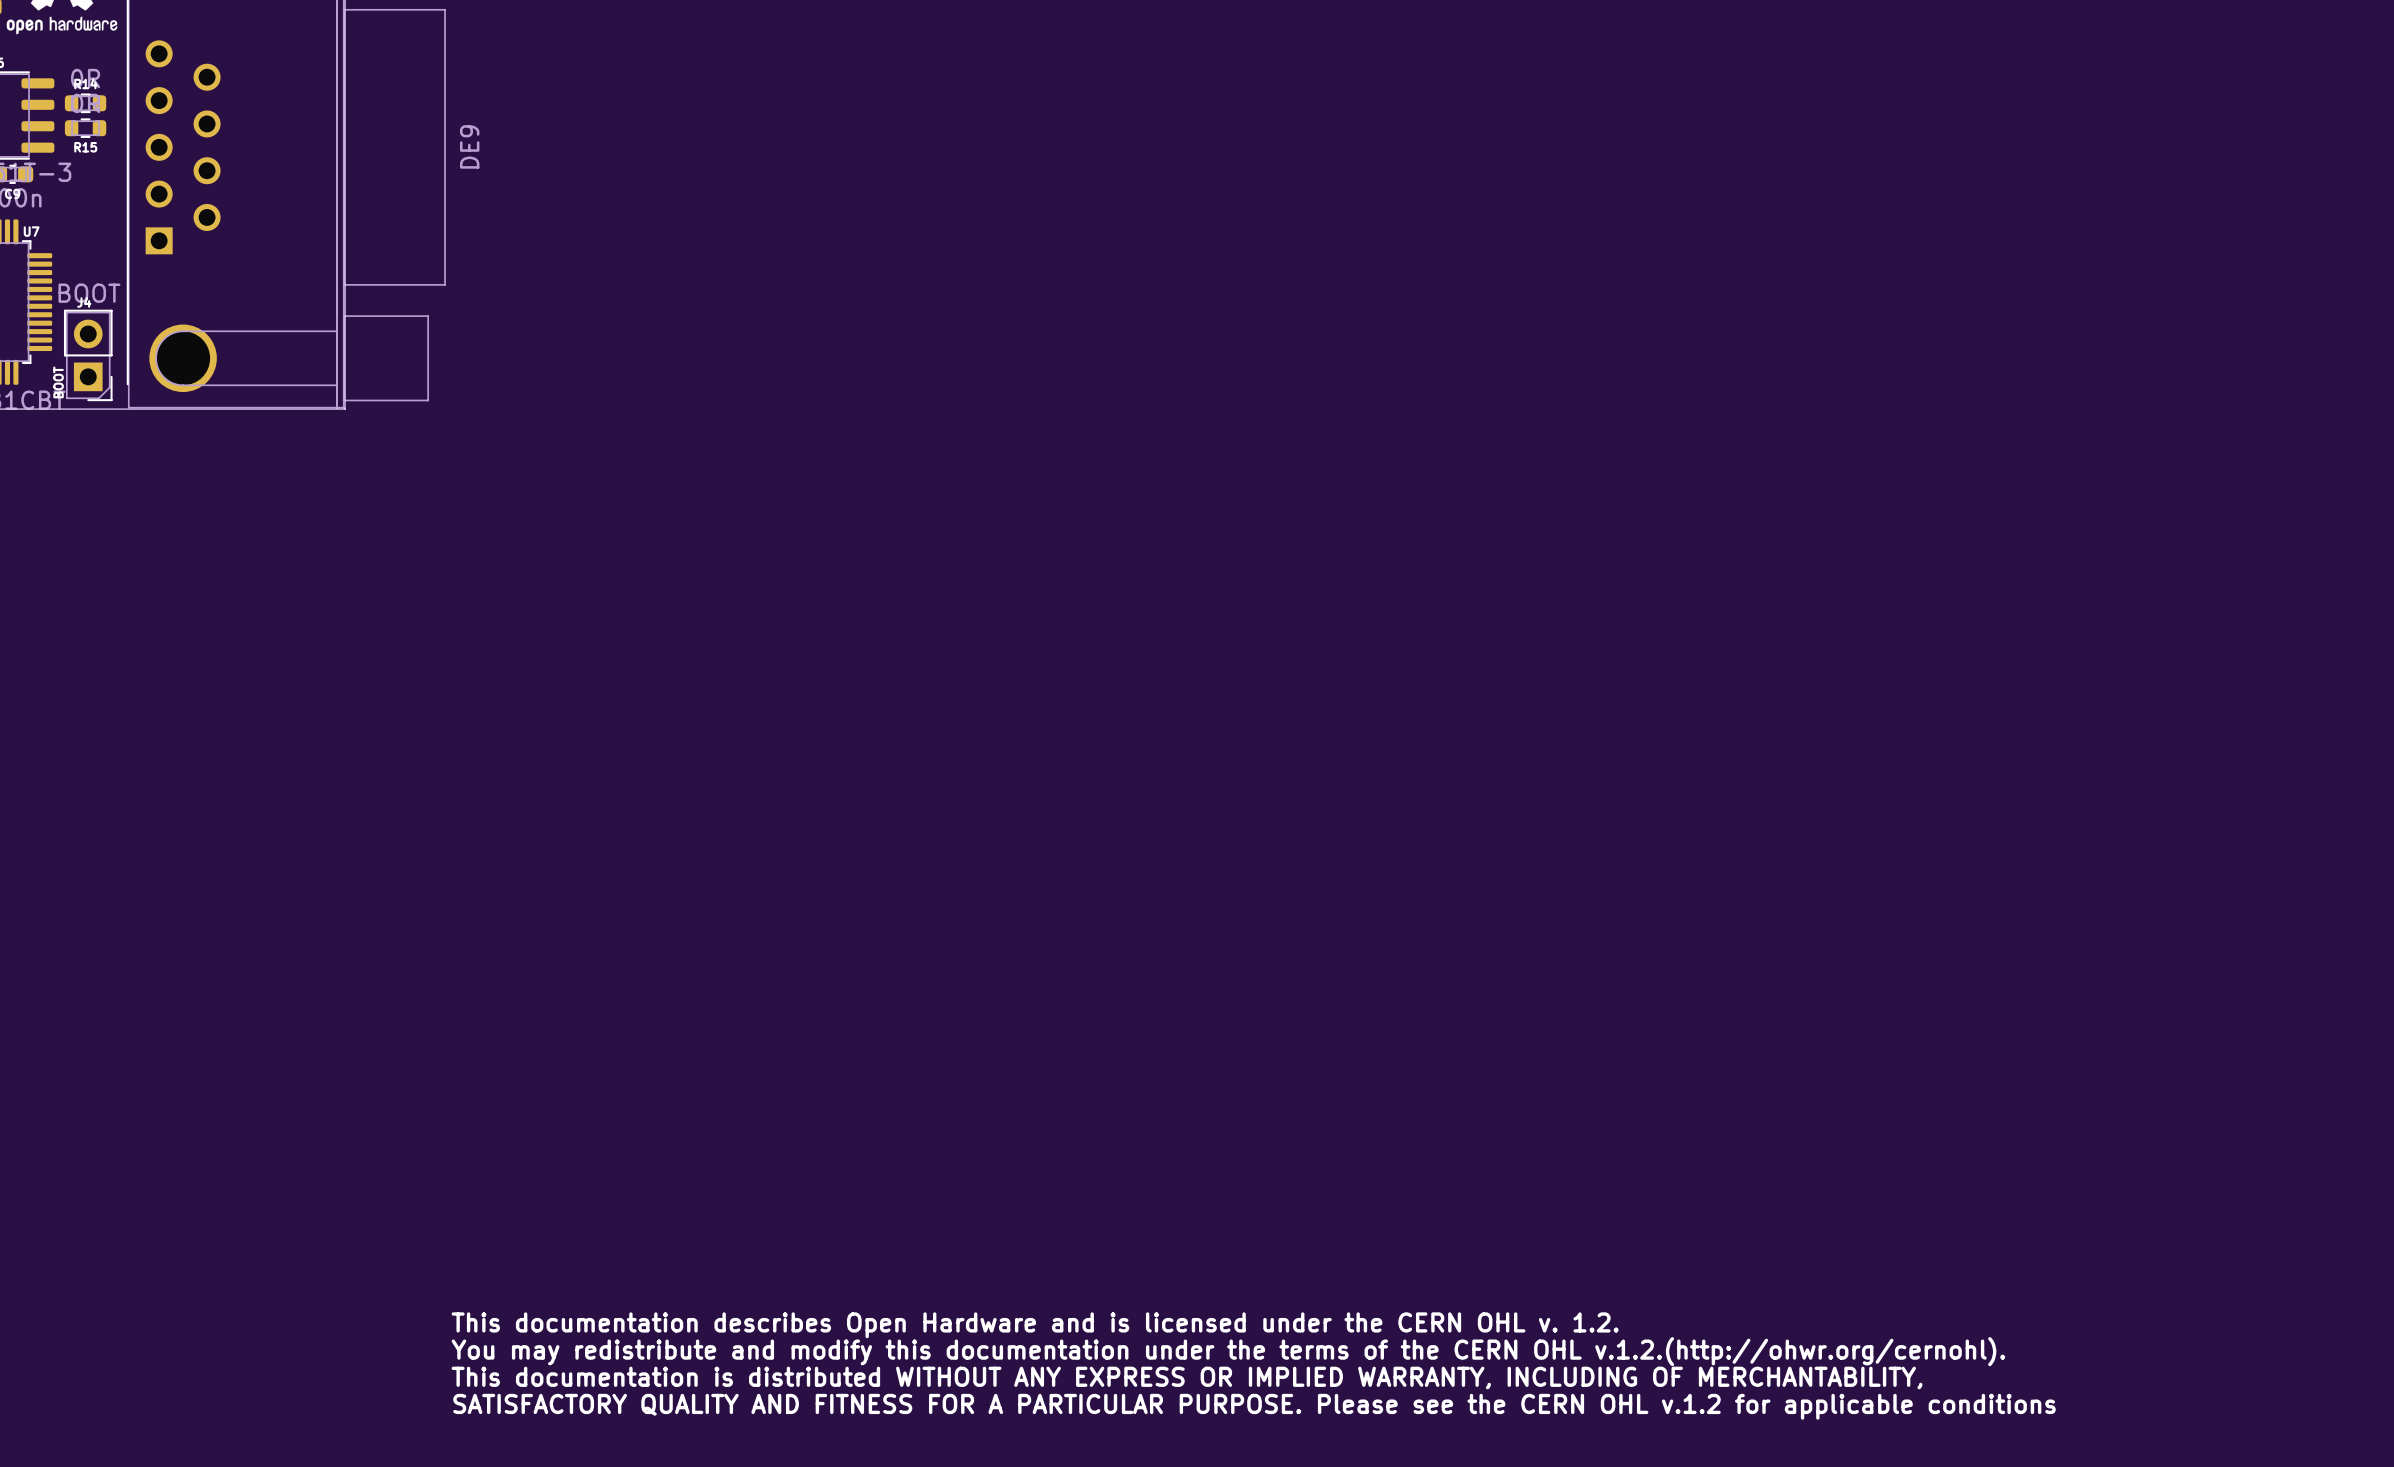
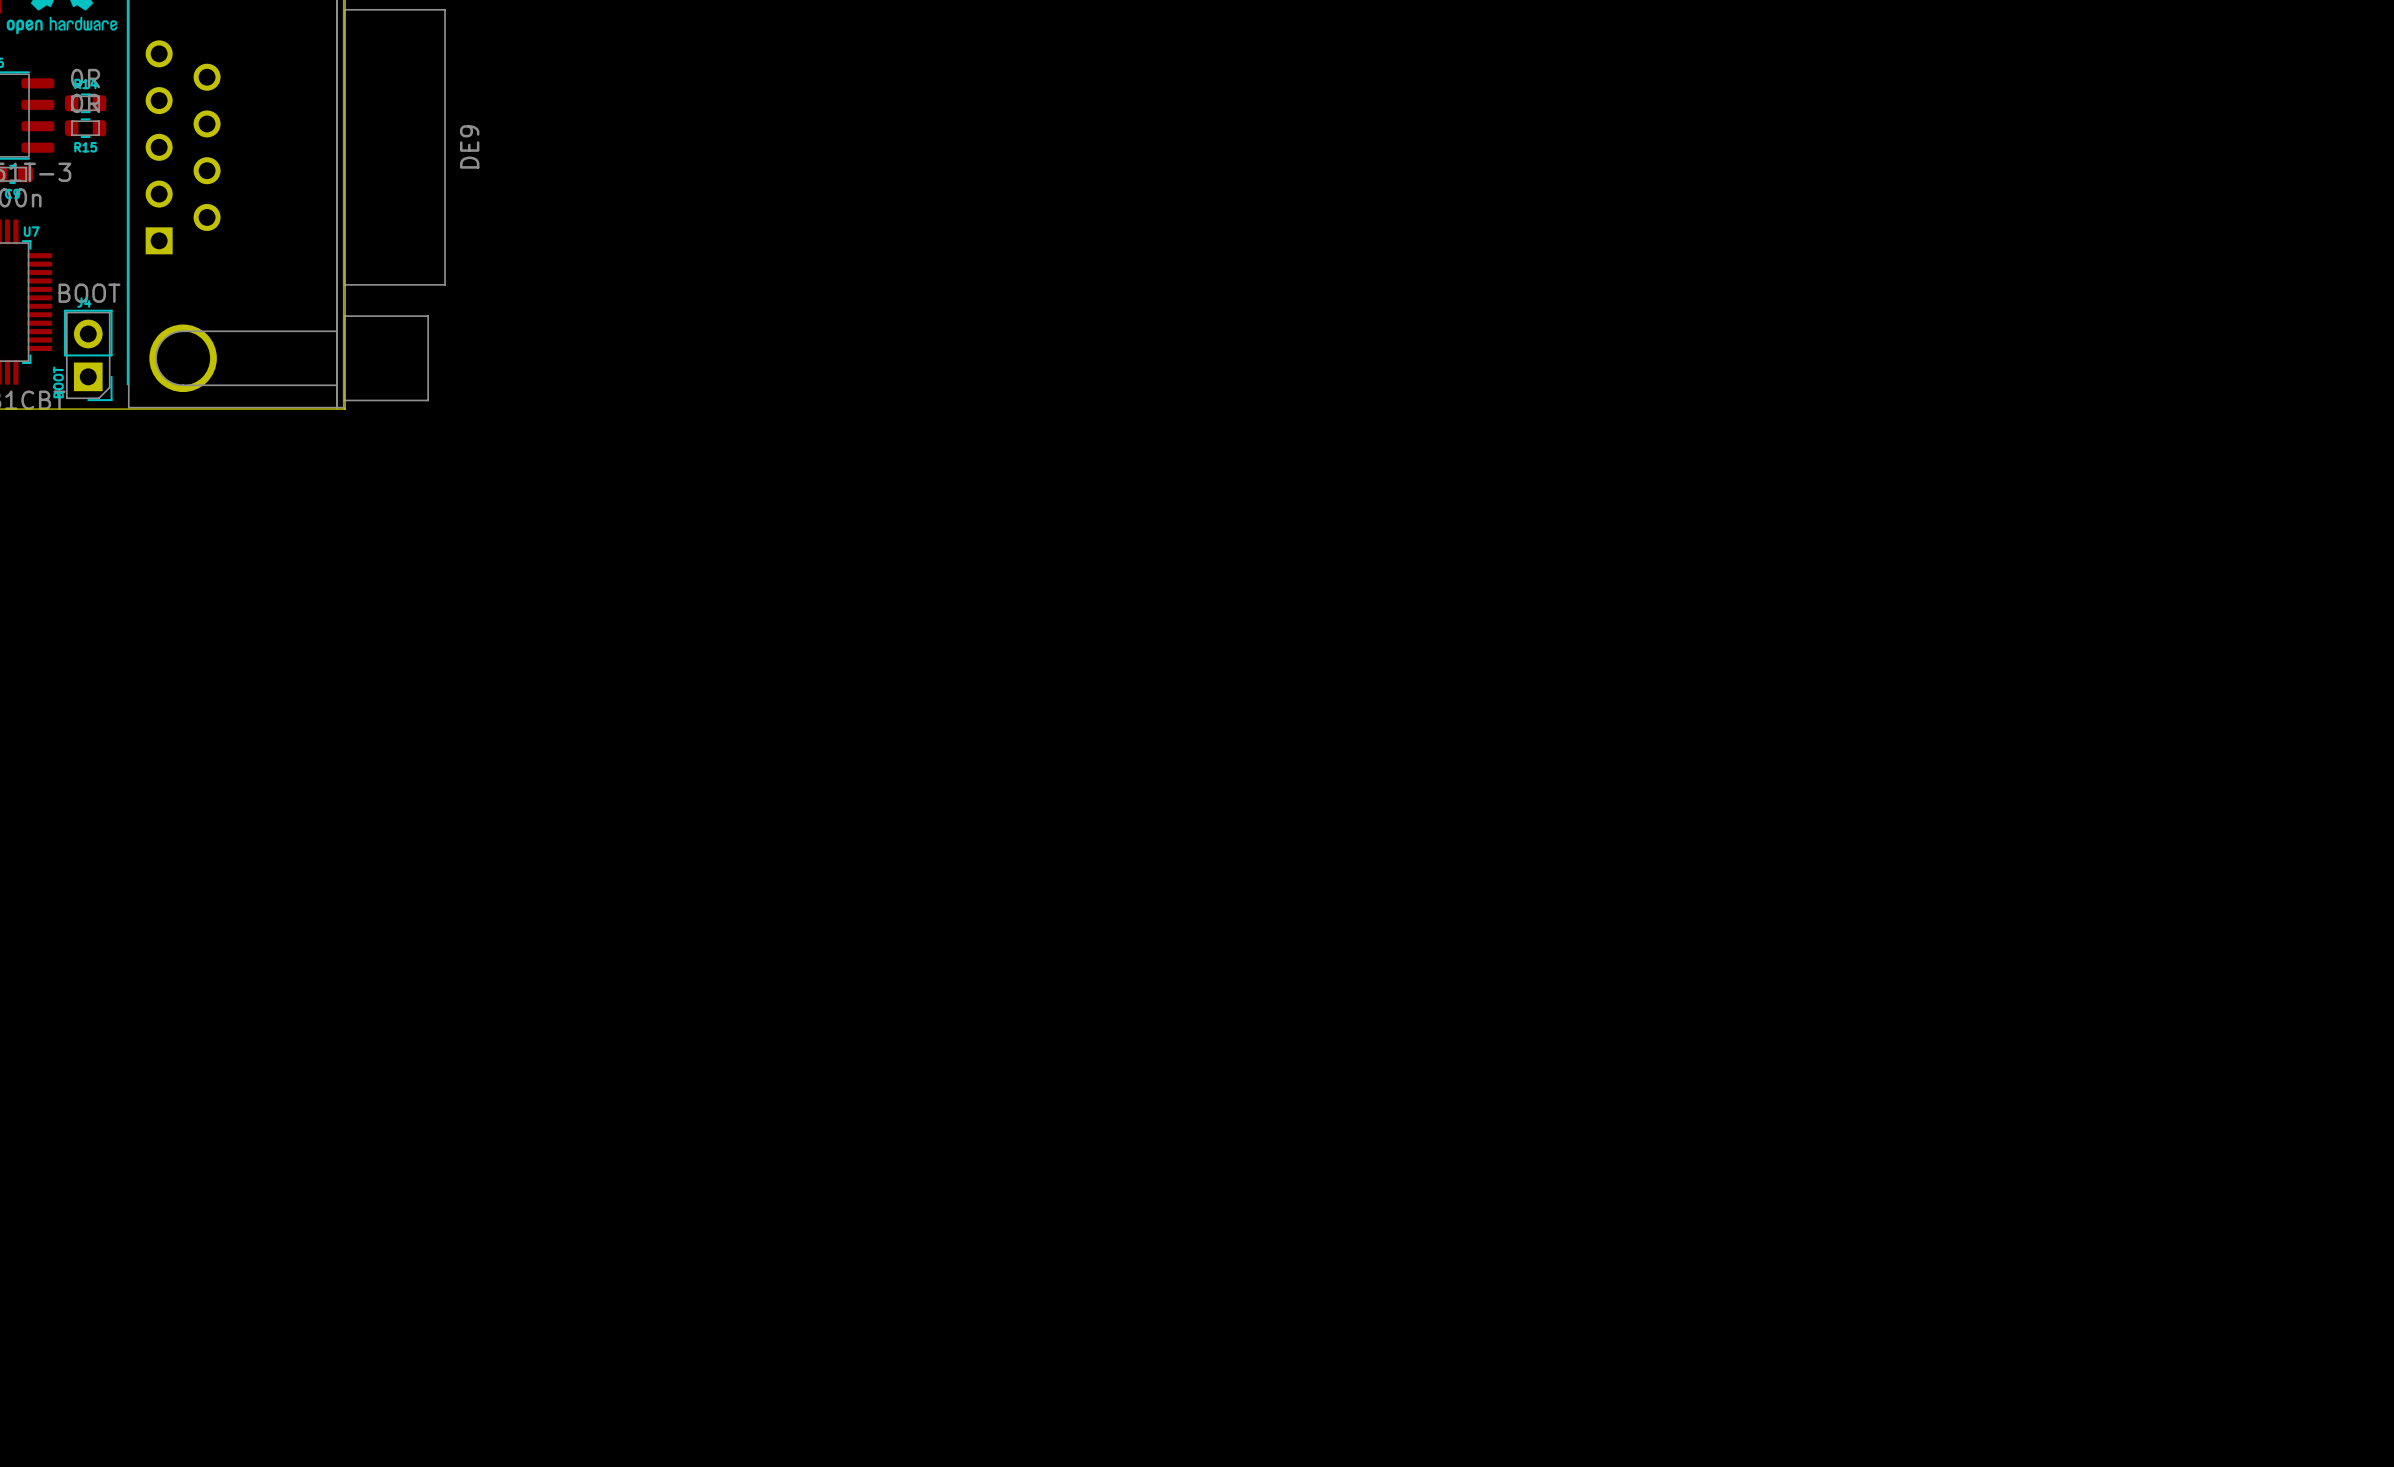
text: This documentation describes Open Hardware and is licensed under the CERN OHL v. 1.2. (1035, 1325) -> none
text: You may redistribute and modify this documentation under the terms of the CERN OHL v.1.2.(http://ohwr.org/cernohl). (1228, 1351) -> none
text: This documentation is distributed WITHOUT ANY EXPRESS OR IMPLIED WARRANTY, INCLUDING OF MERCHANTABILITY, (1187, 1377) -> none
text: SATISFACTORY QUALITY AND FITNESS FOR A PARTICULAR PURPOSE. Please see the CERN OHL v.1.2 for applicable conditions (1254, 1406) -> none

